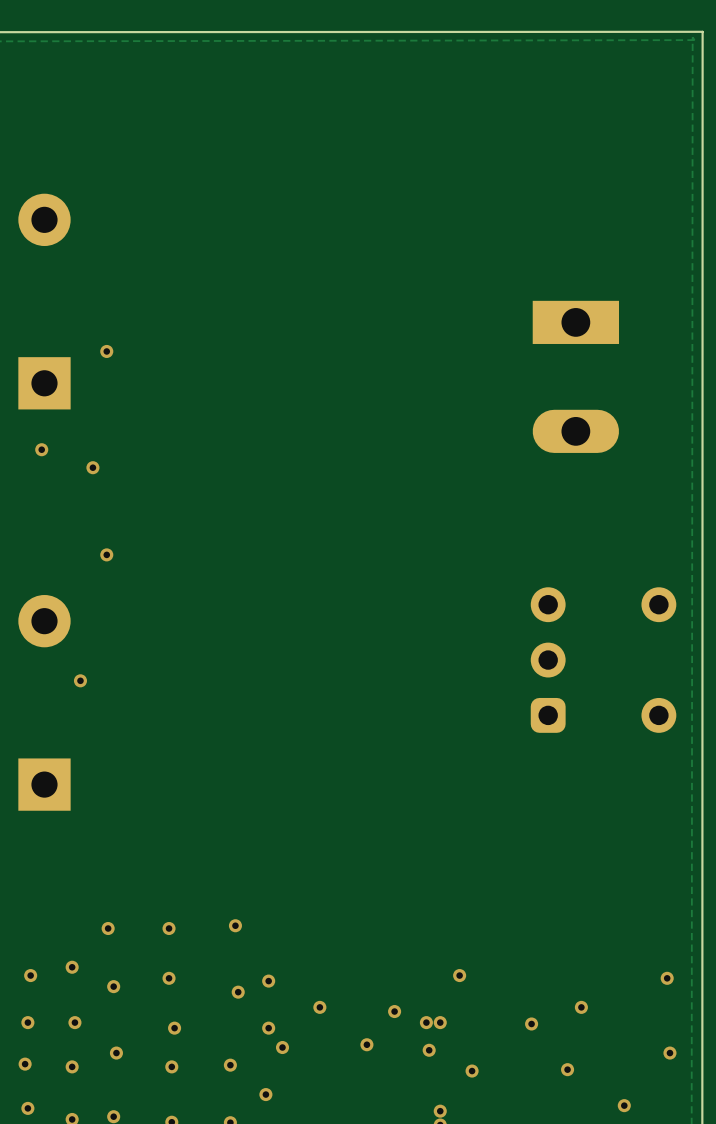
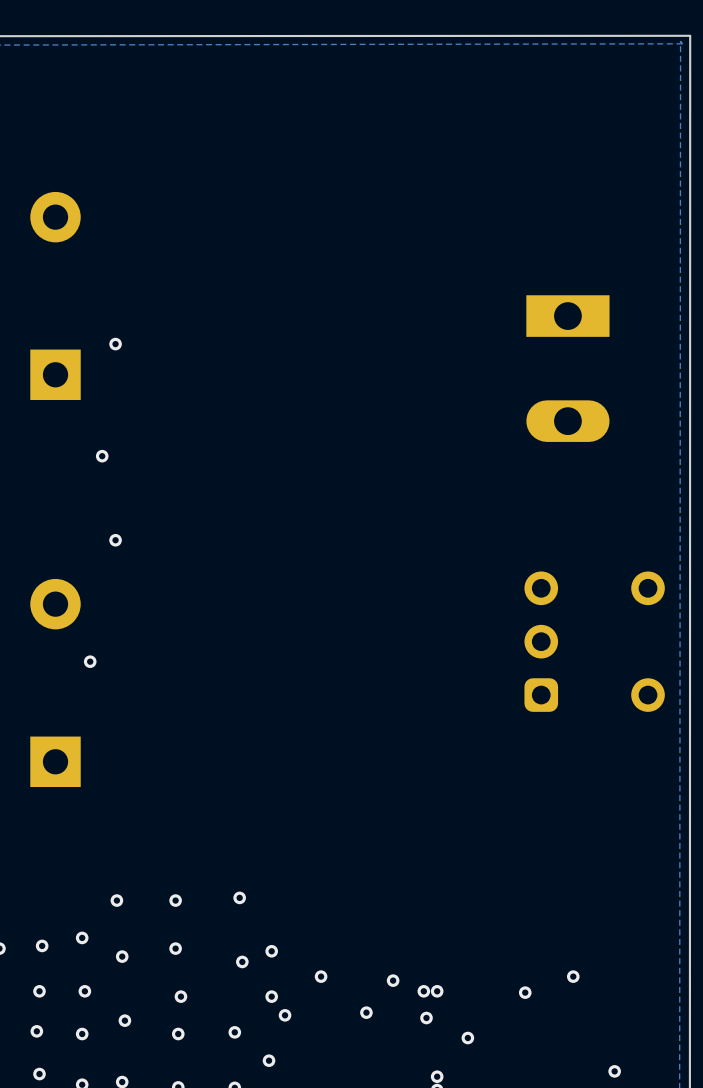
via: (41, 449) -> none
via: (459, 975) -> none
via: (667, 978) -> none
via: (669, 1053) -> none
via: (567, 1069) -> none

